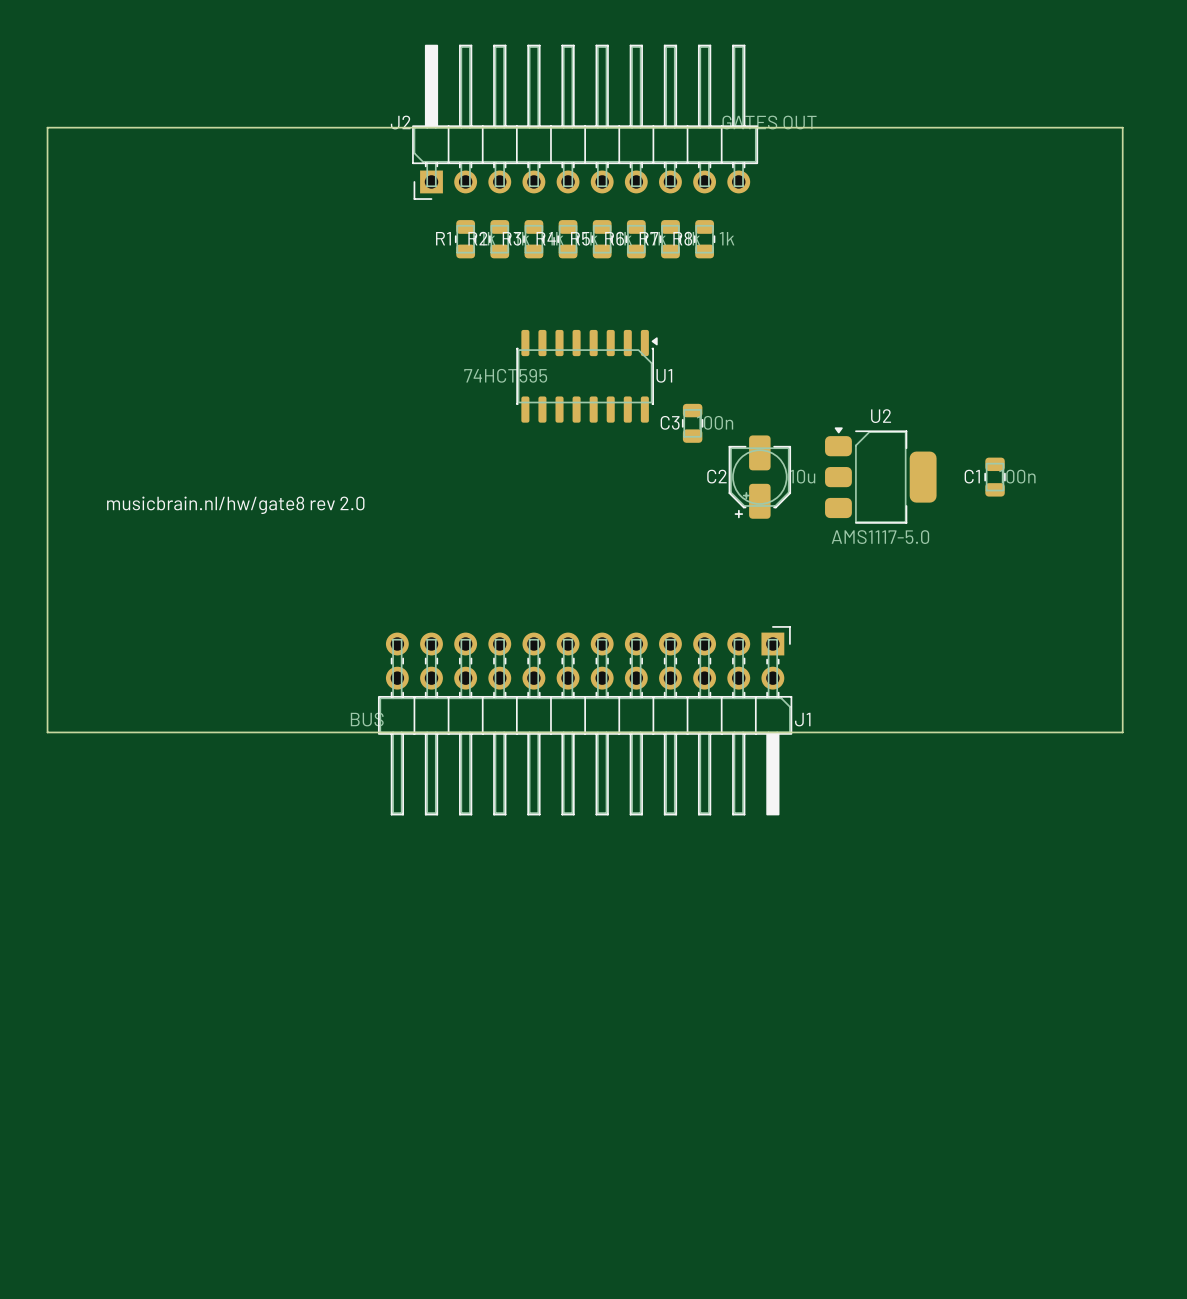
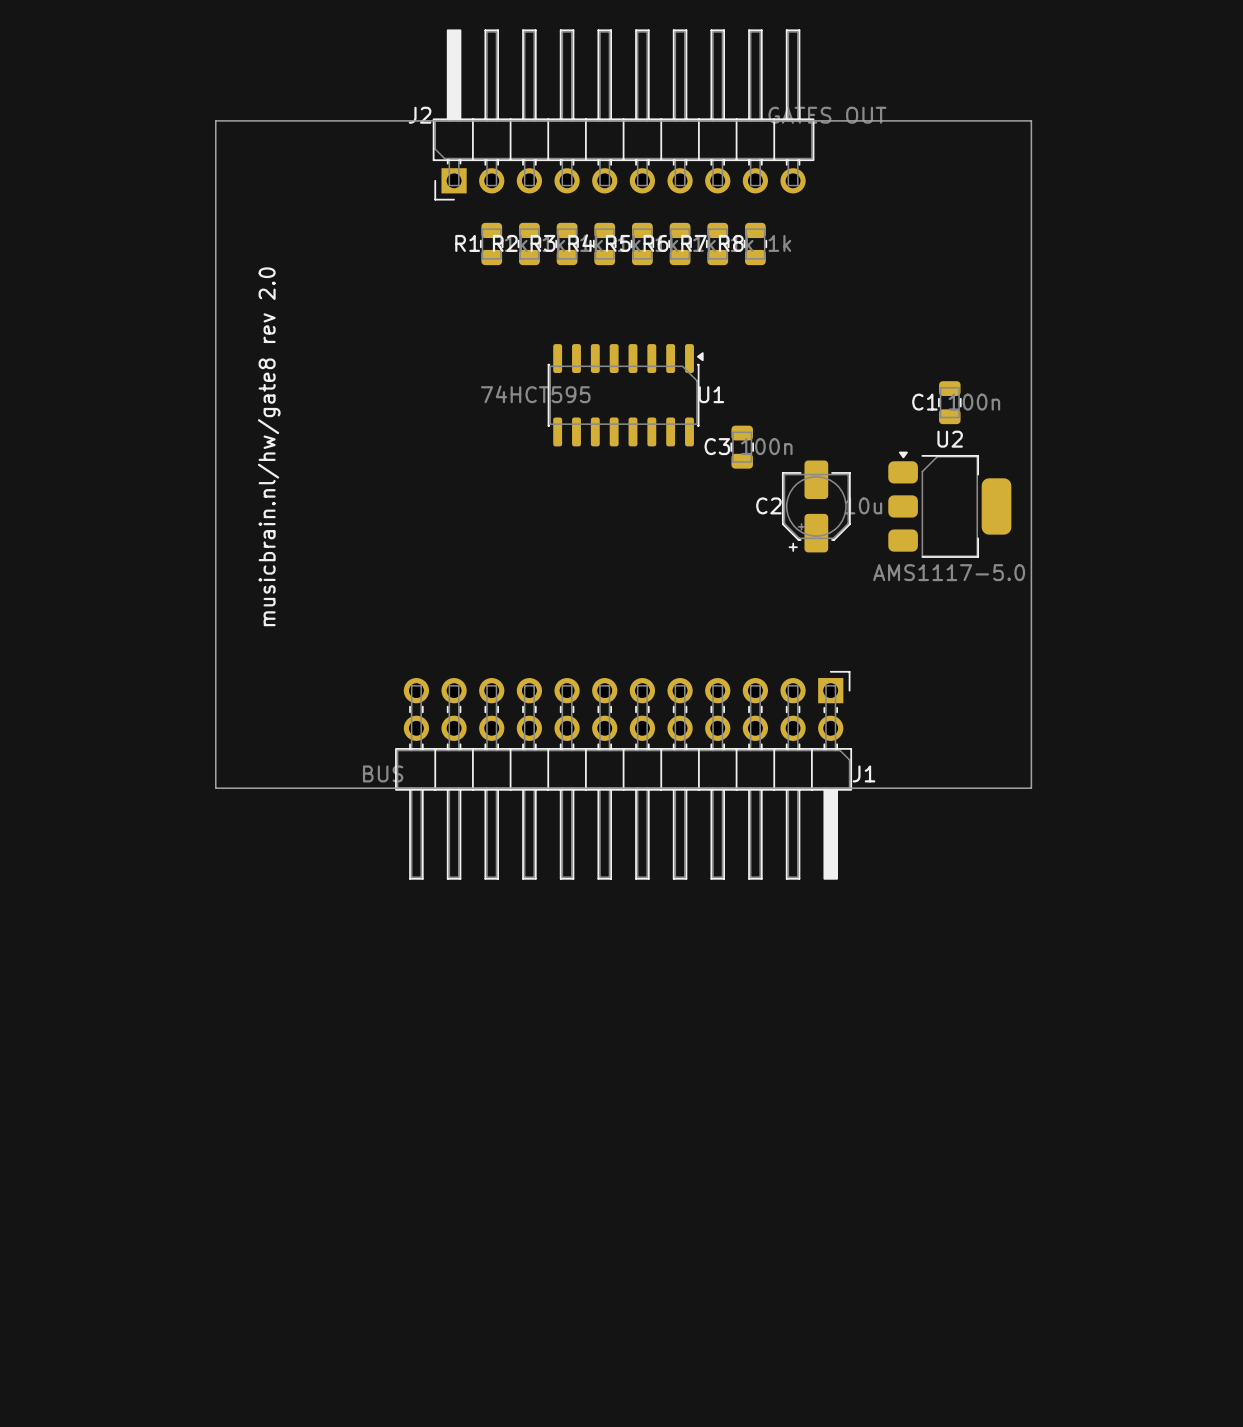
board edge: (215, 127) (47, 127) (47, 732) (215, 732) -> (215, 120) (215, 788)
board edge: (954, 127) (1122, 127) (1122, 732) (954, 732) -> (1031, 120) (1031, 788)
C1 position: (995, 477) -> (949, 402)
text rotation: 0° (235, 505) -> 90° counterclockwise (269, 446)

